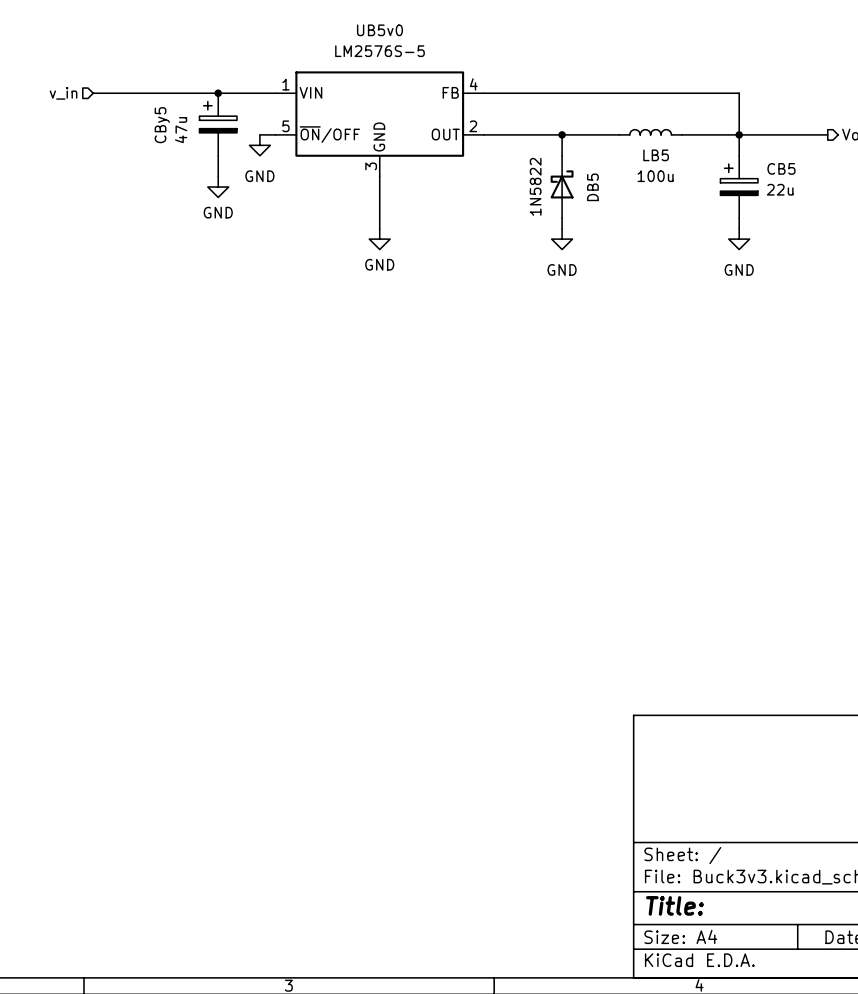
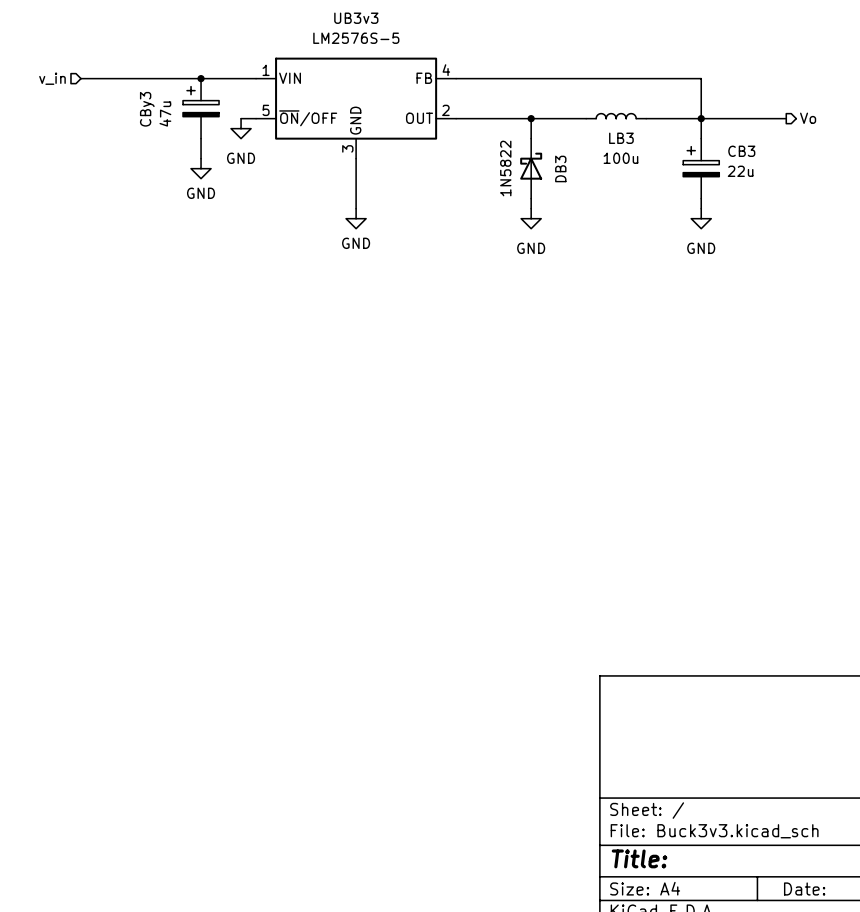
UB5v0 name: UB5v0 (379, 30) -> UB3v3 (356, 18)
CBy5 name: CBy5 (162, 125) -> CBy3 (147, 109)
LB5 name: LB5 (656, 155) -> LB3 (621, 138)
CB5 name: CB5 (781, 168) -> CB3 (741, 151)
DB5 name: DB5 (592, 187) -> DB3 (560, 168)

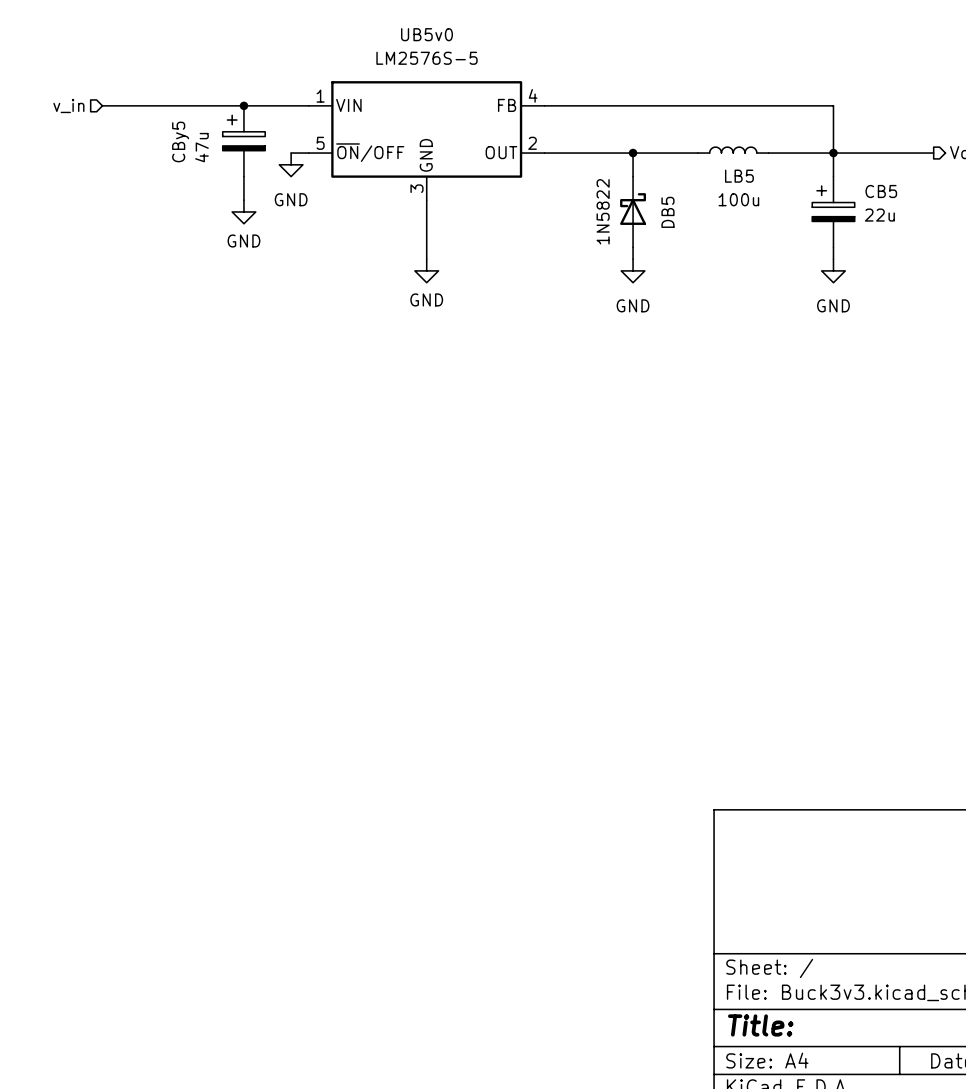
UB3v3 name: UB3v3 (356, 18) -> UB5v0 (426, 34)
CBy3 name: CBy3 (147, 109) -> CBy5 (180, 141)
LB3 name: LB3 (621, 138) -> LB5 (739, 176)
CB3 name: CB3 (741, 151) -> CB5 (881, 191)
DB3 name: DB3 (560, 168) -> DB5 (667, 212)

